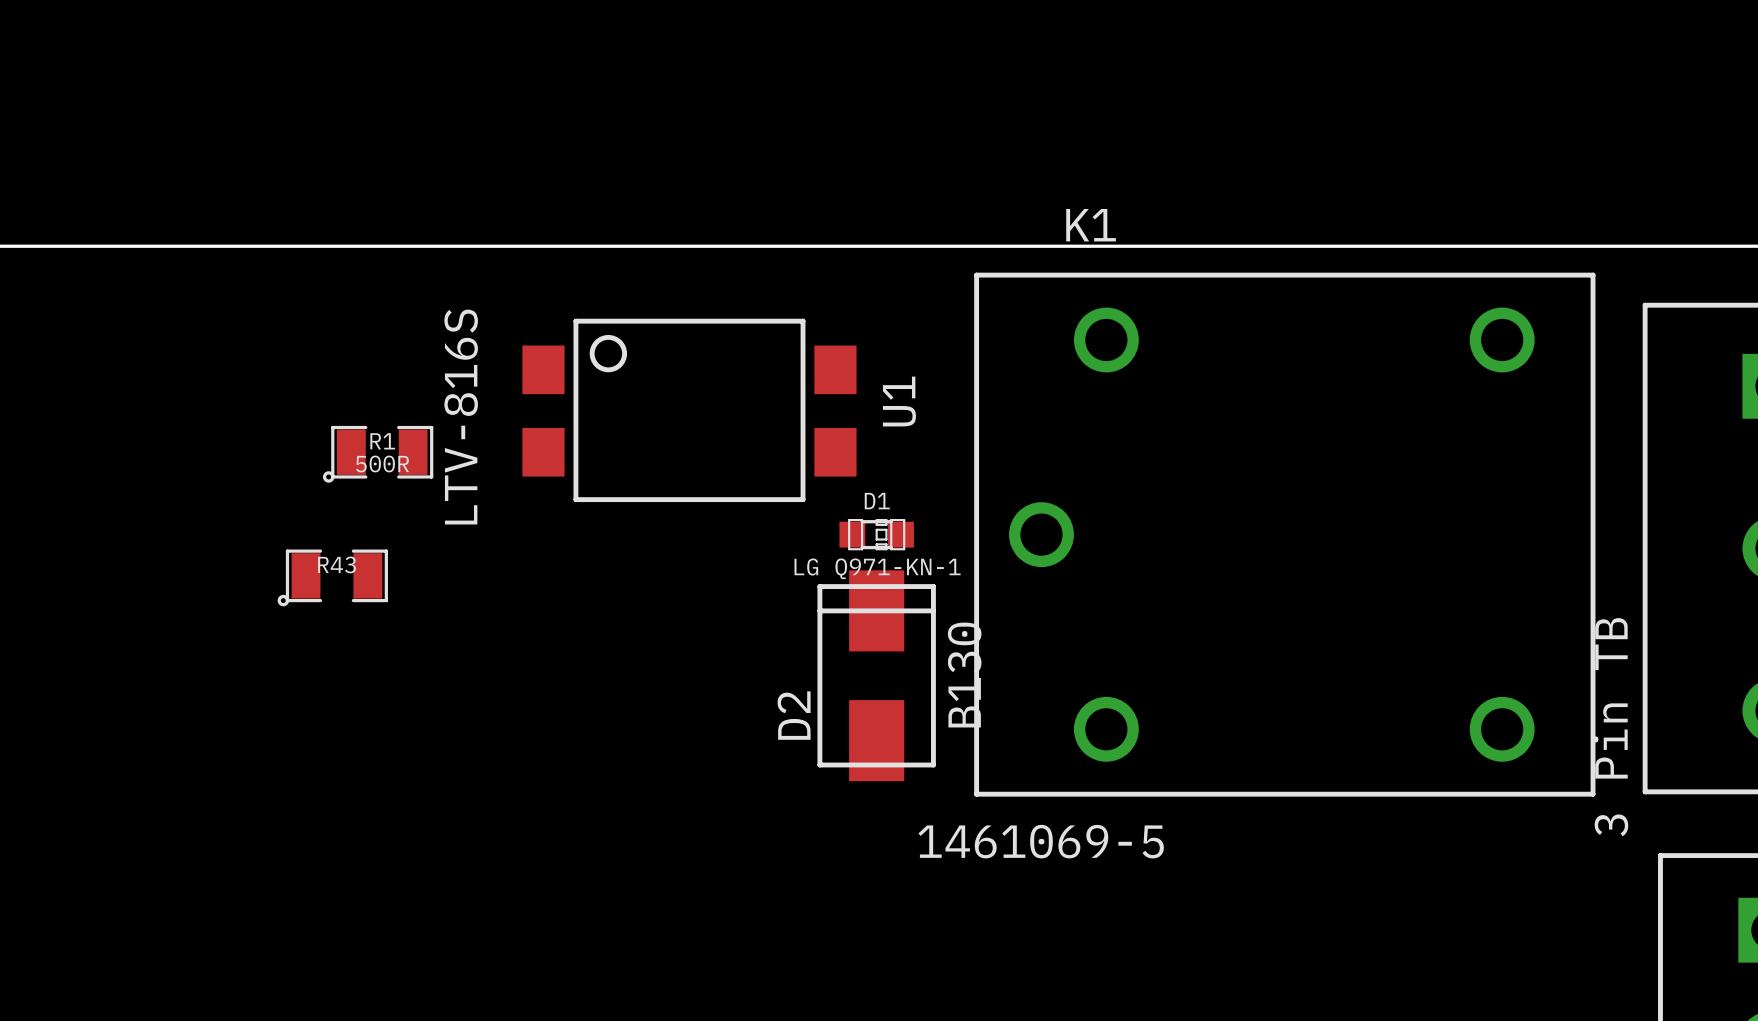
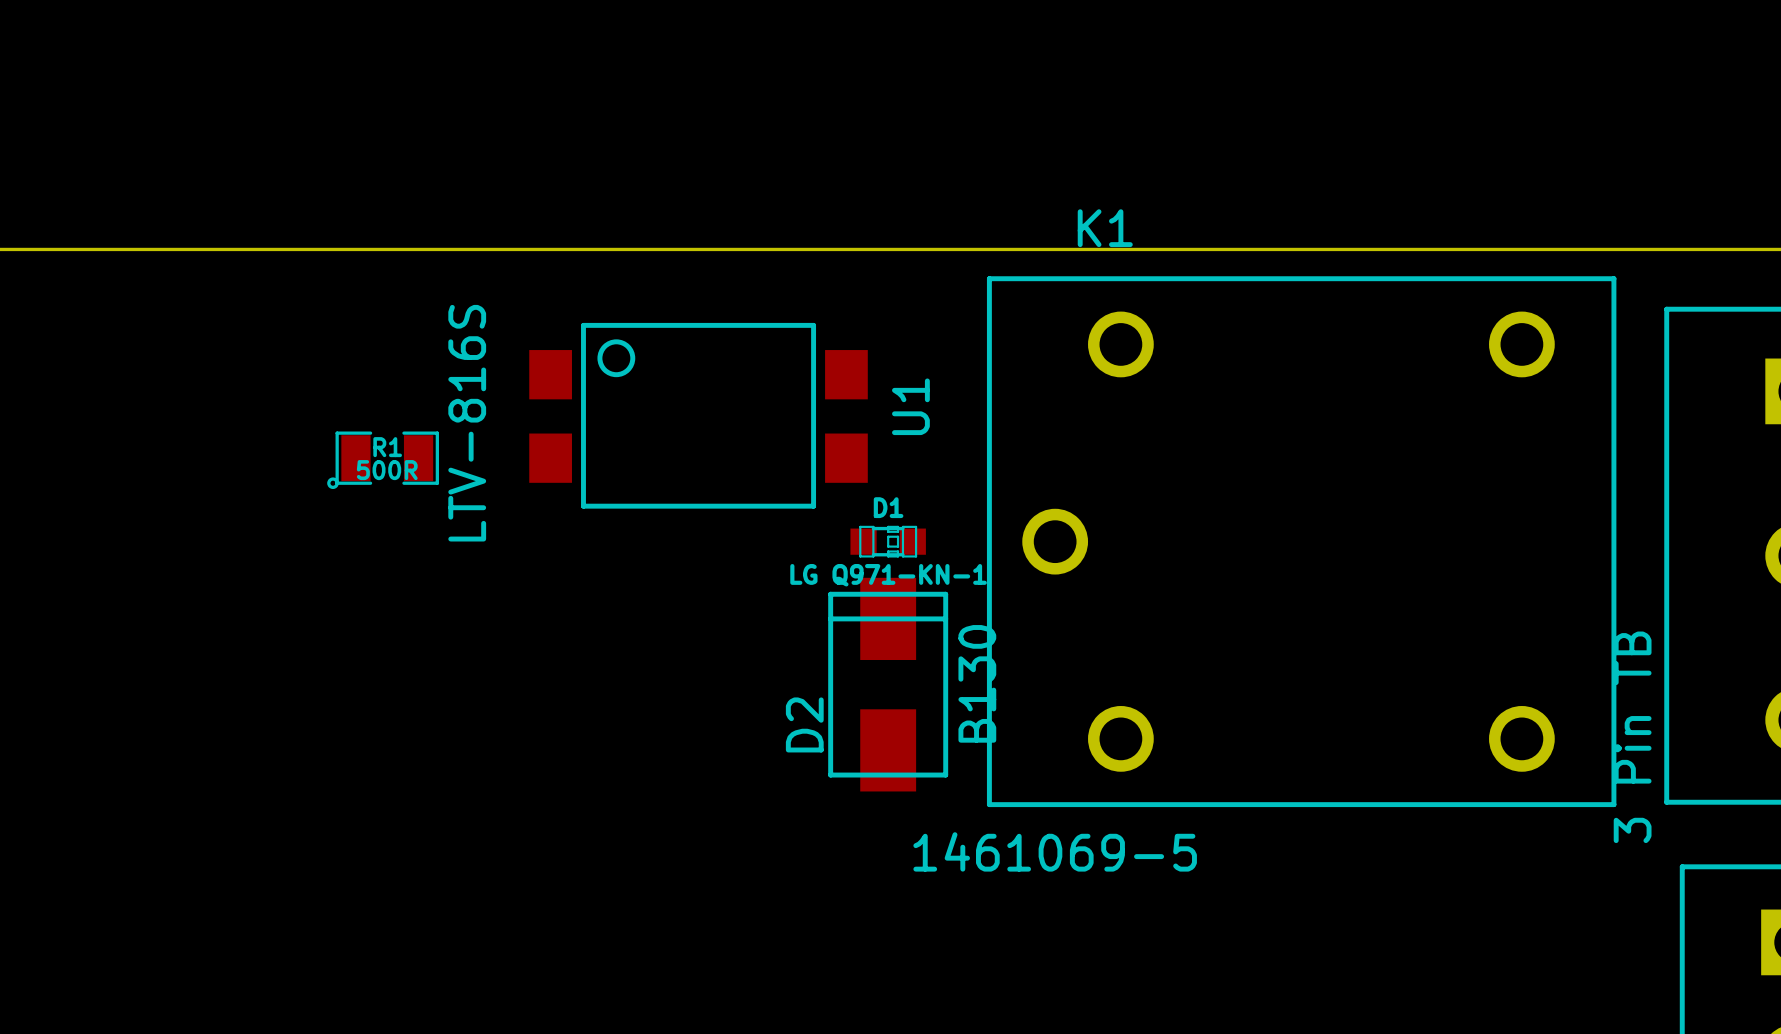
R43: (332, 577) -> none

